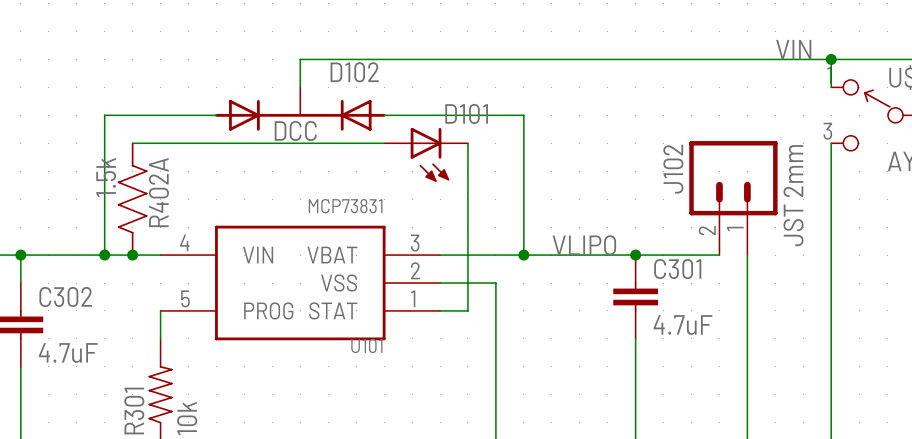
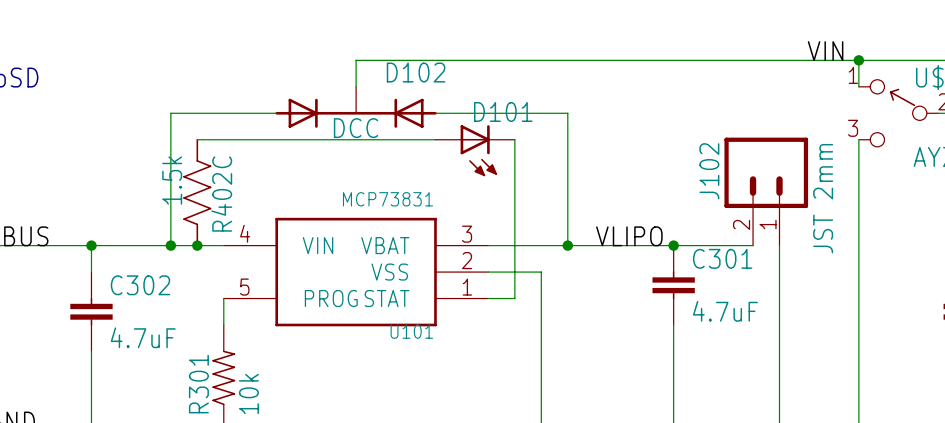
R402A name: R402A (158, 192) -> R402C (221, 194)

